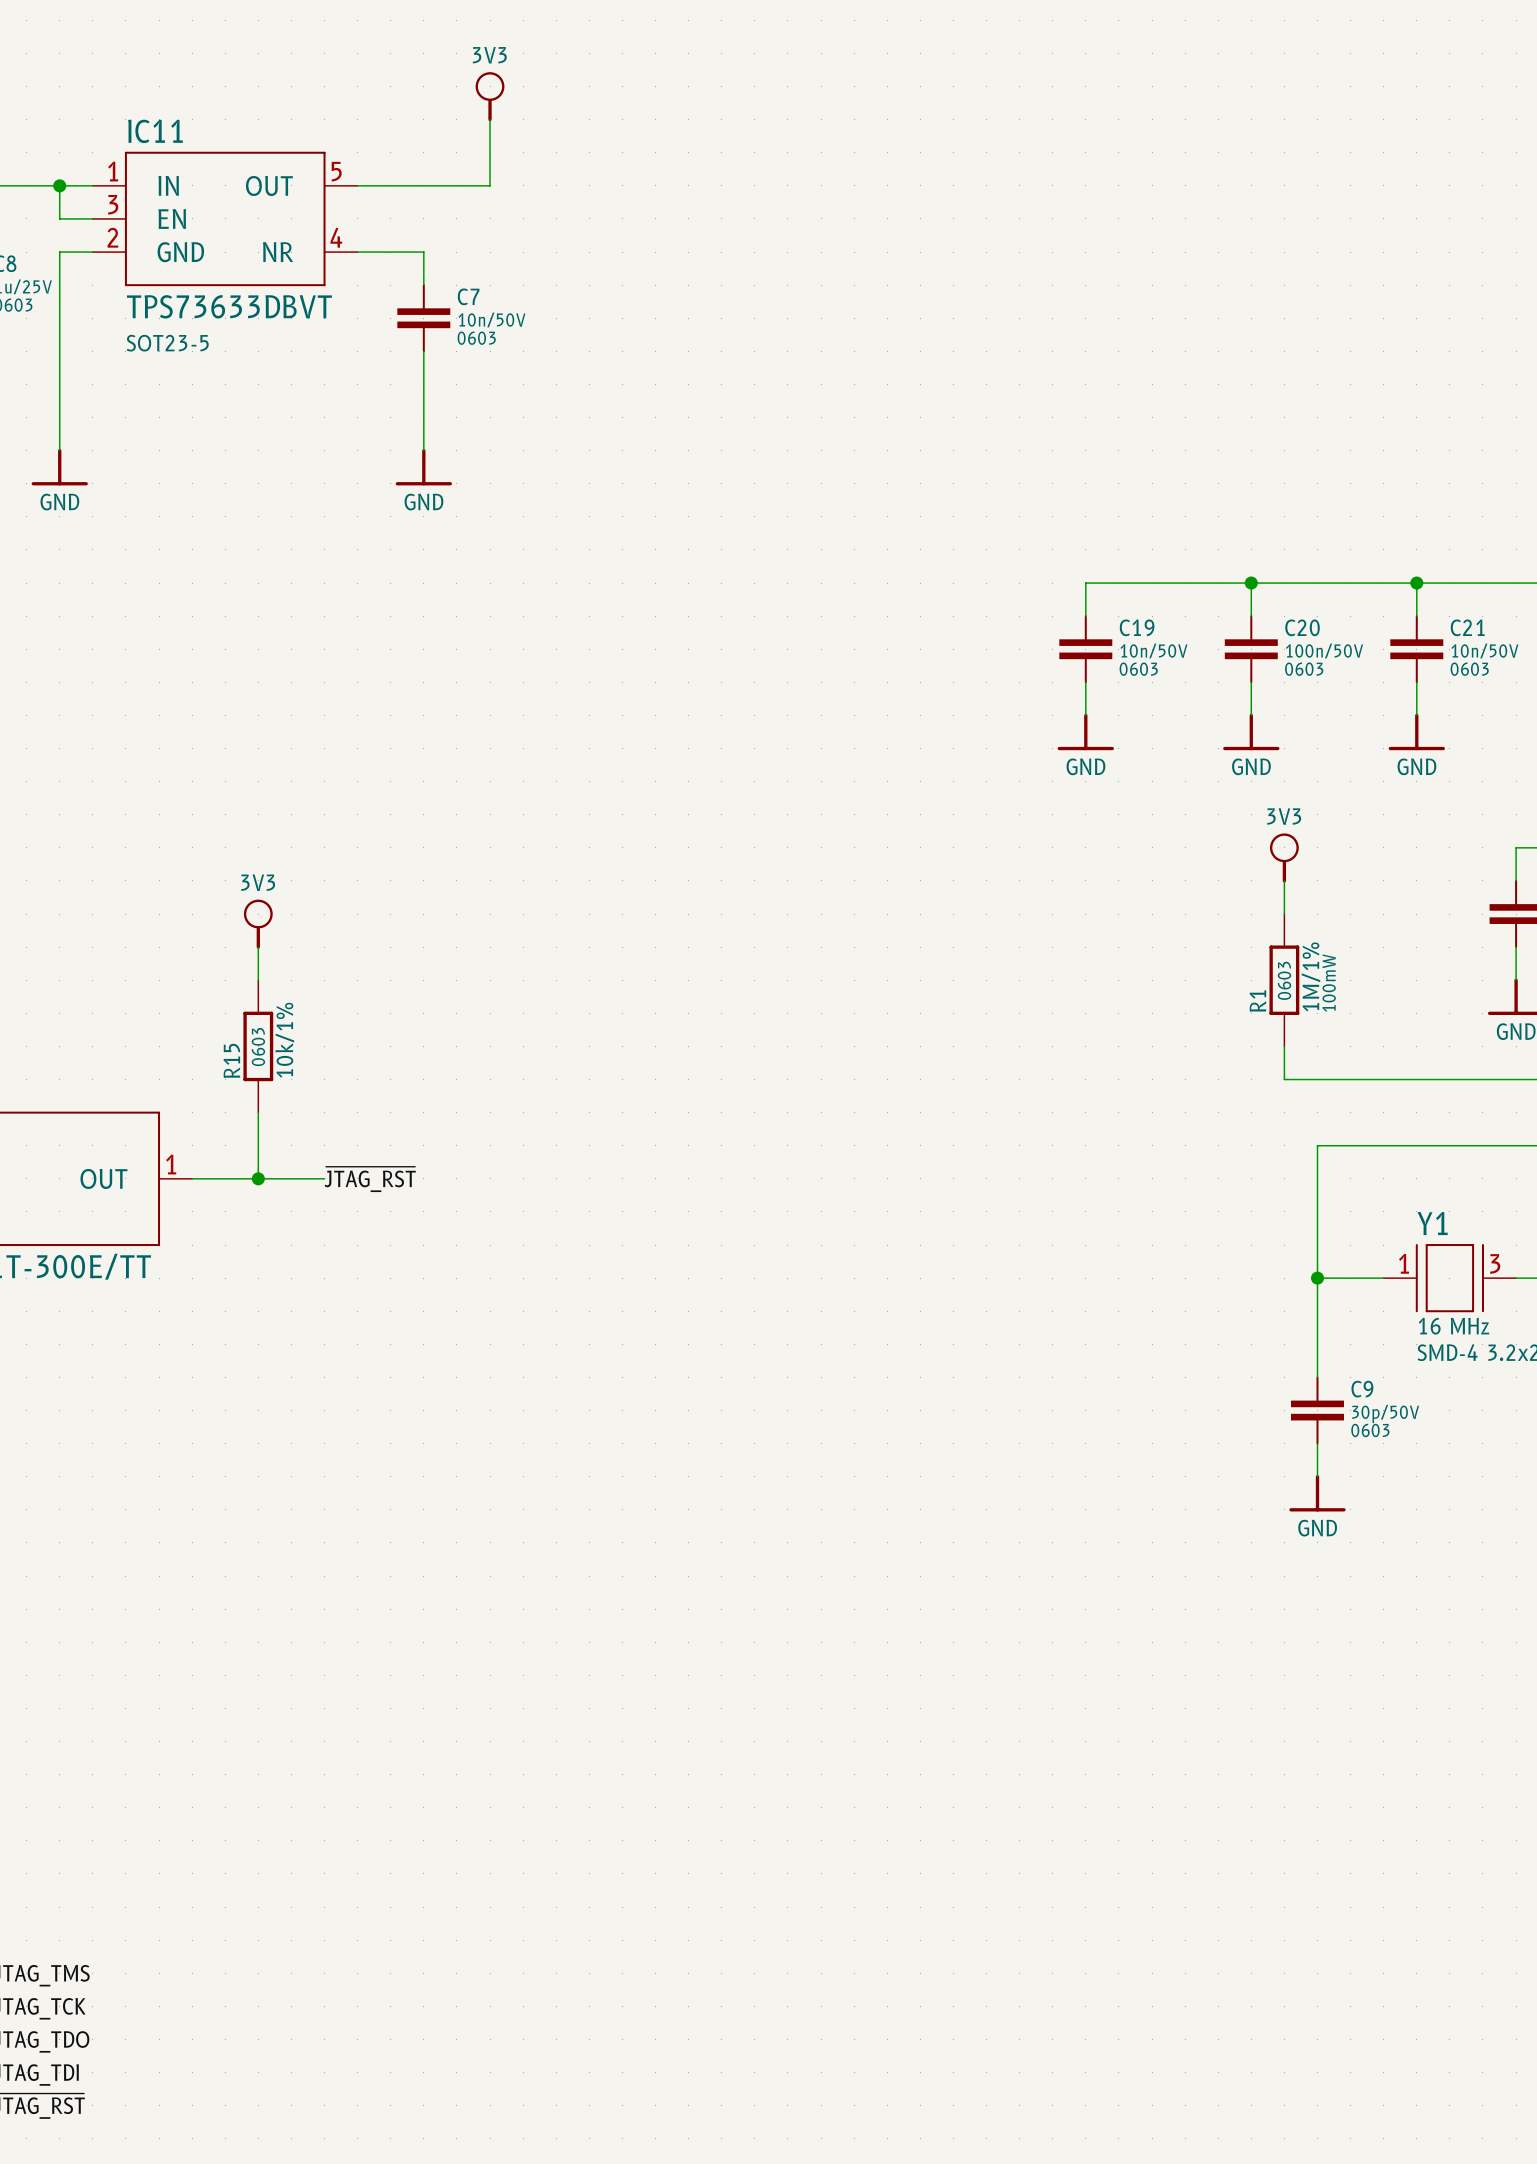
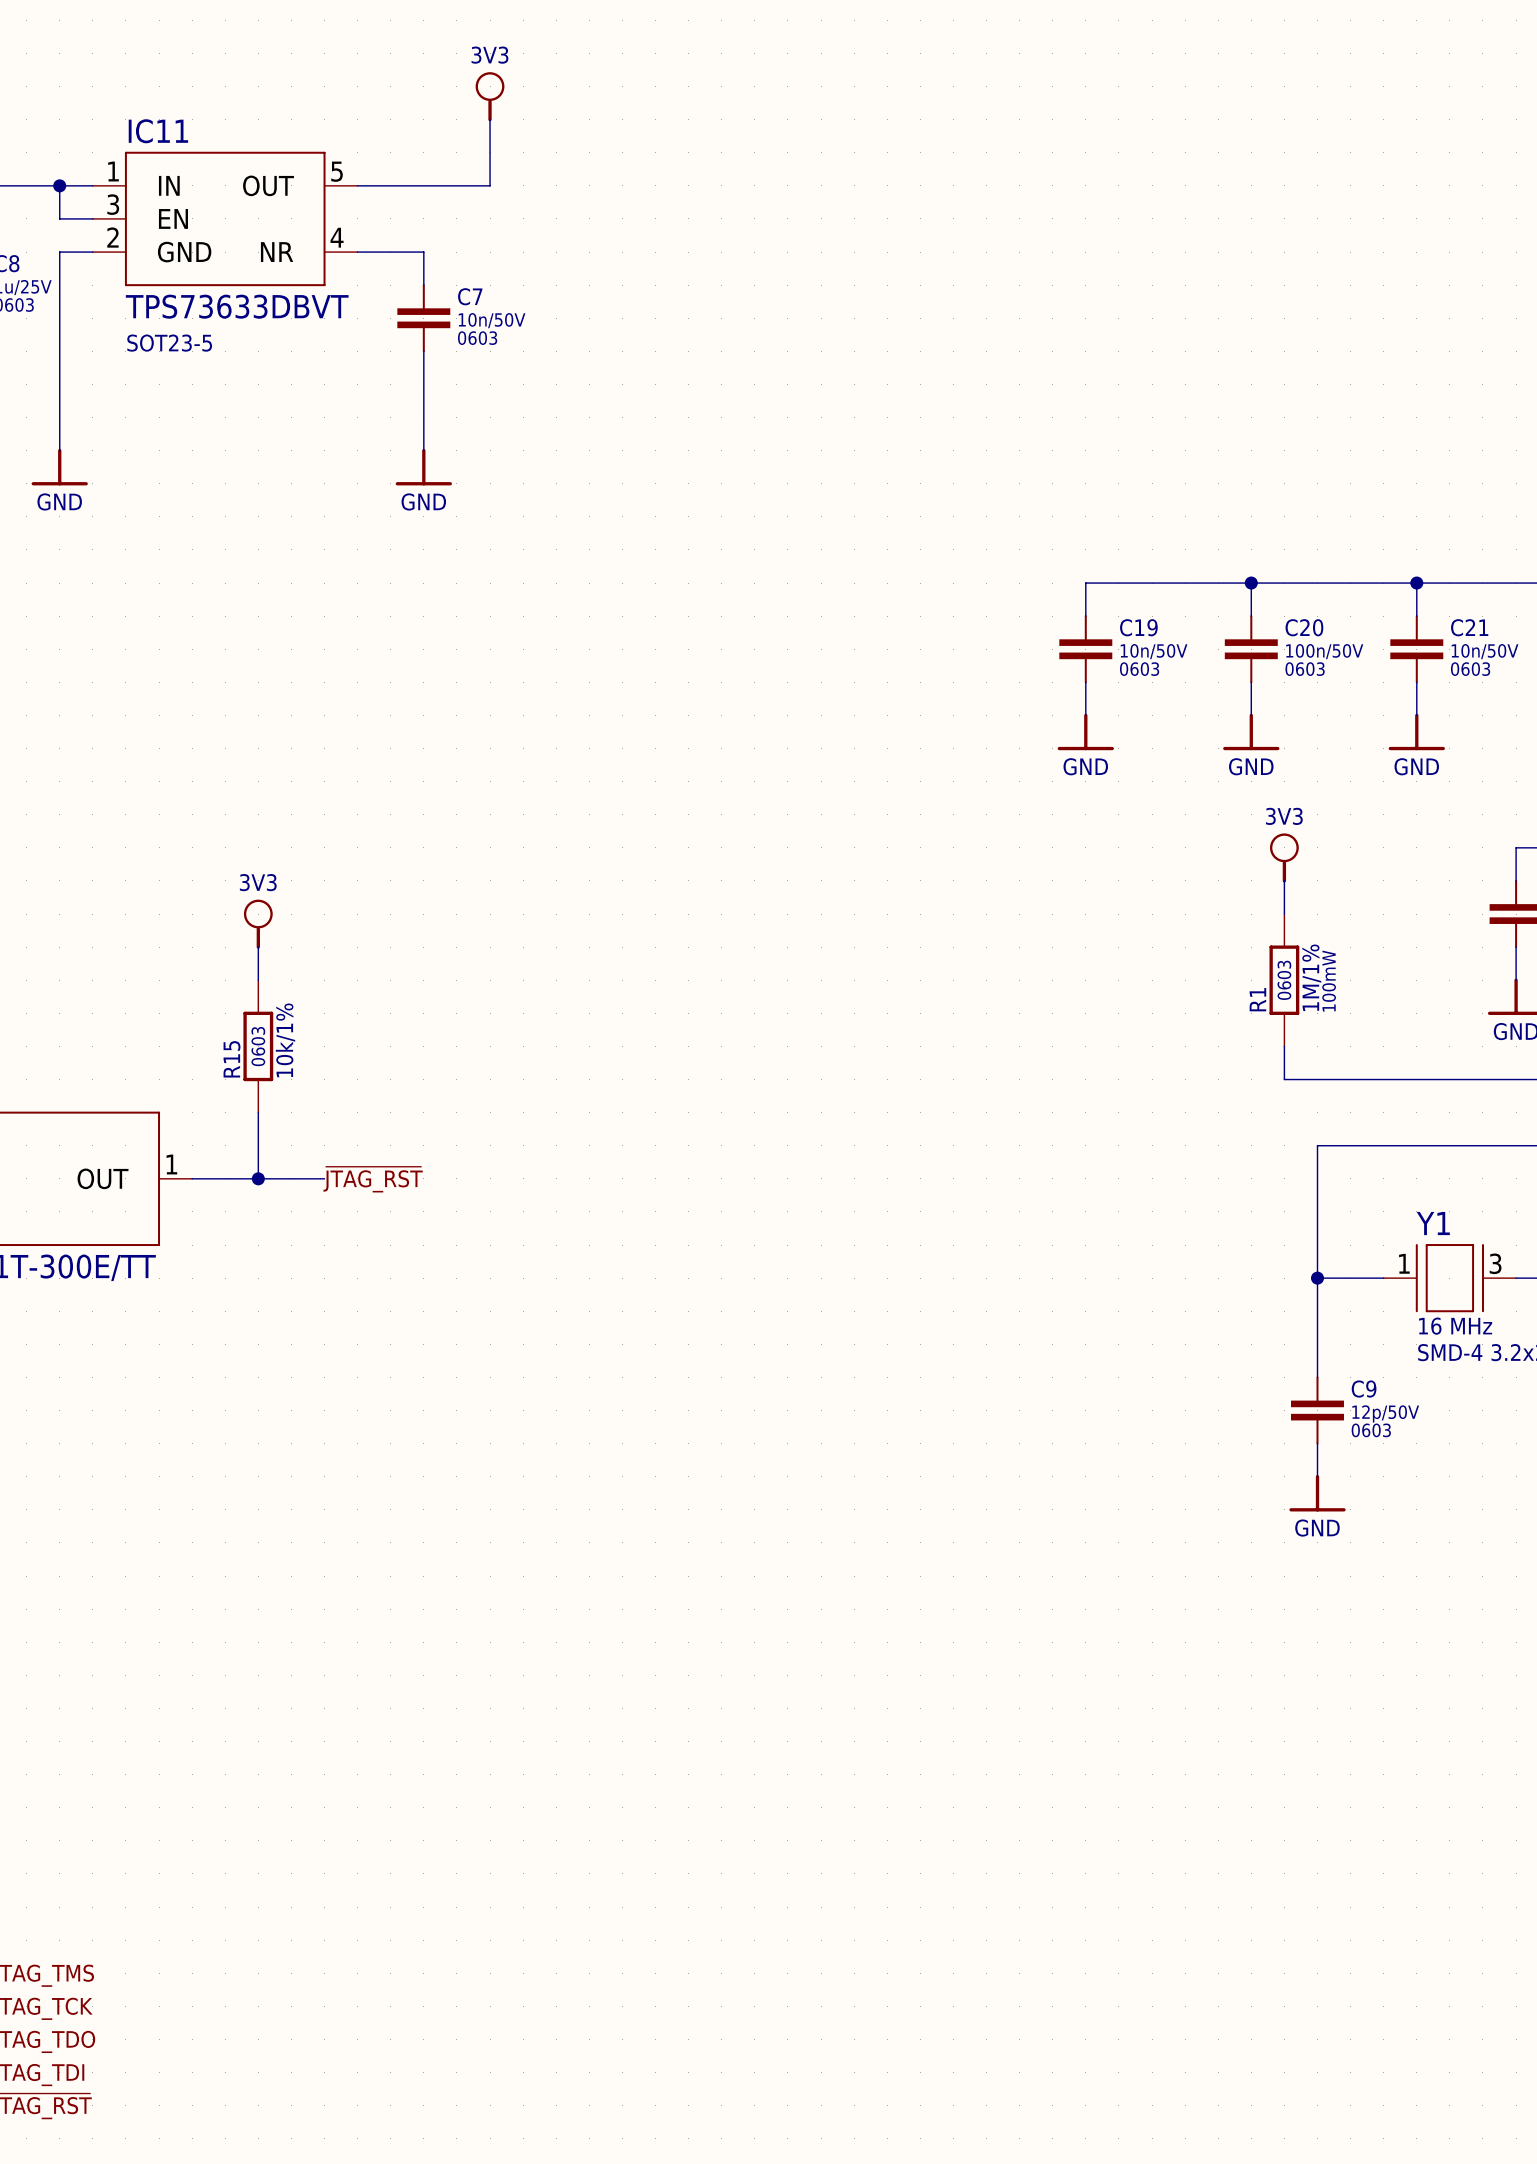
C9 value: 30p/50V (1385, 1414) -> 12p/50V (1385, 1413)

